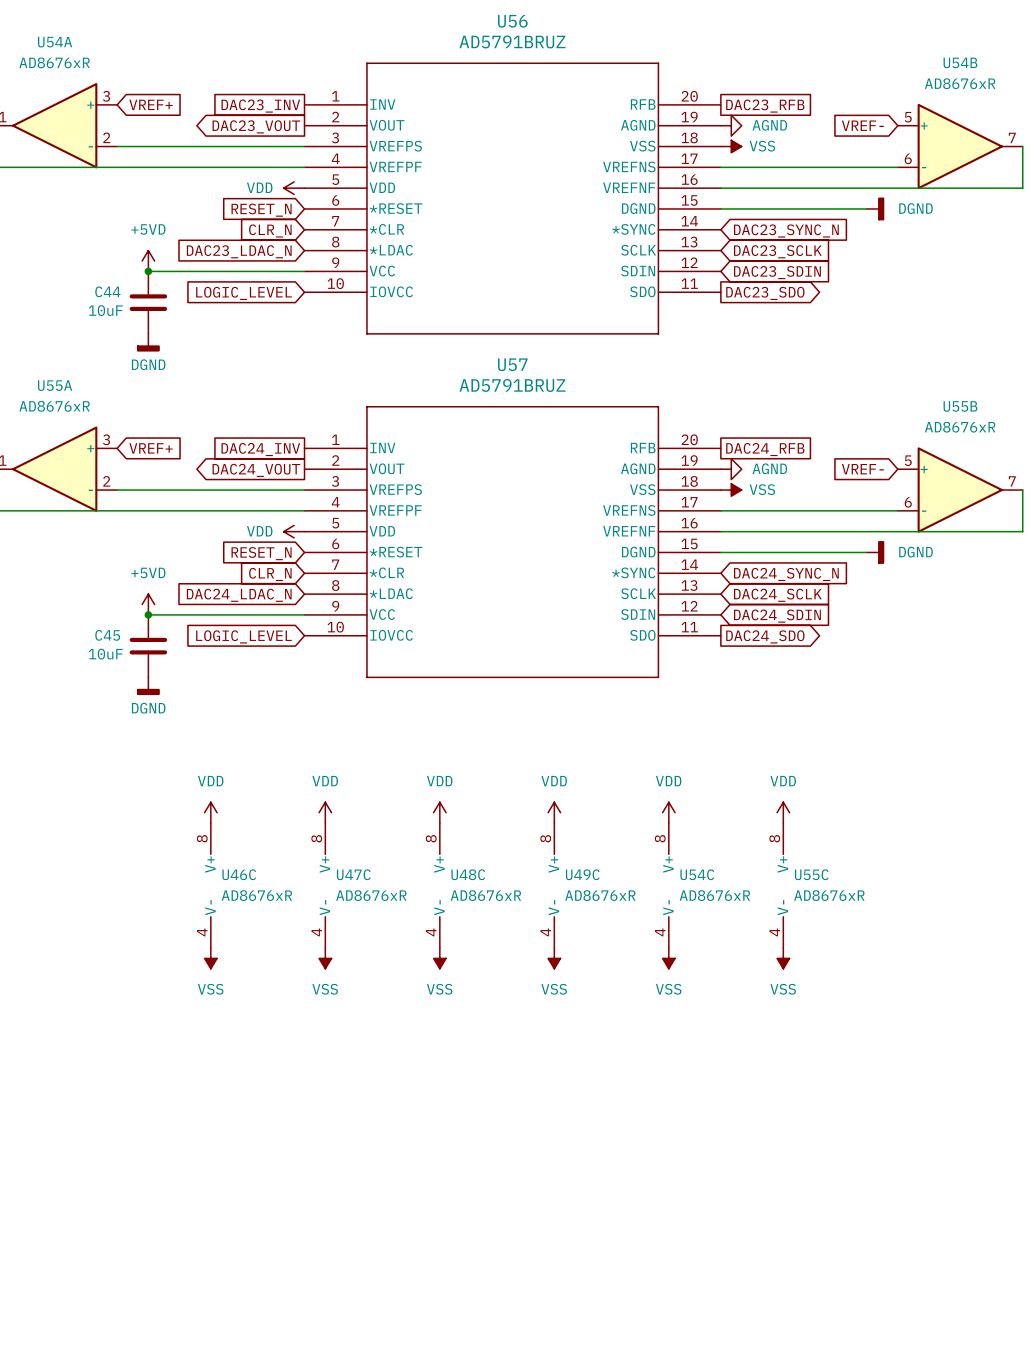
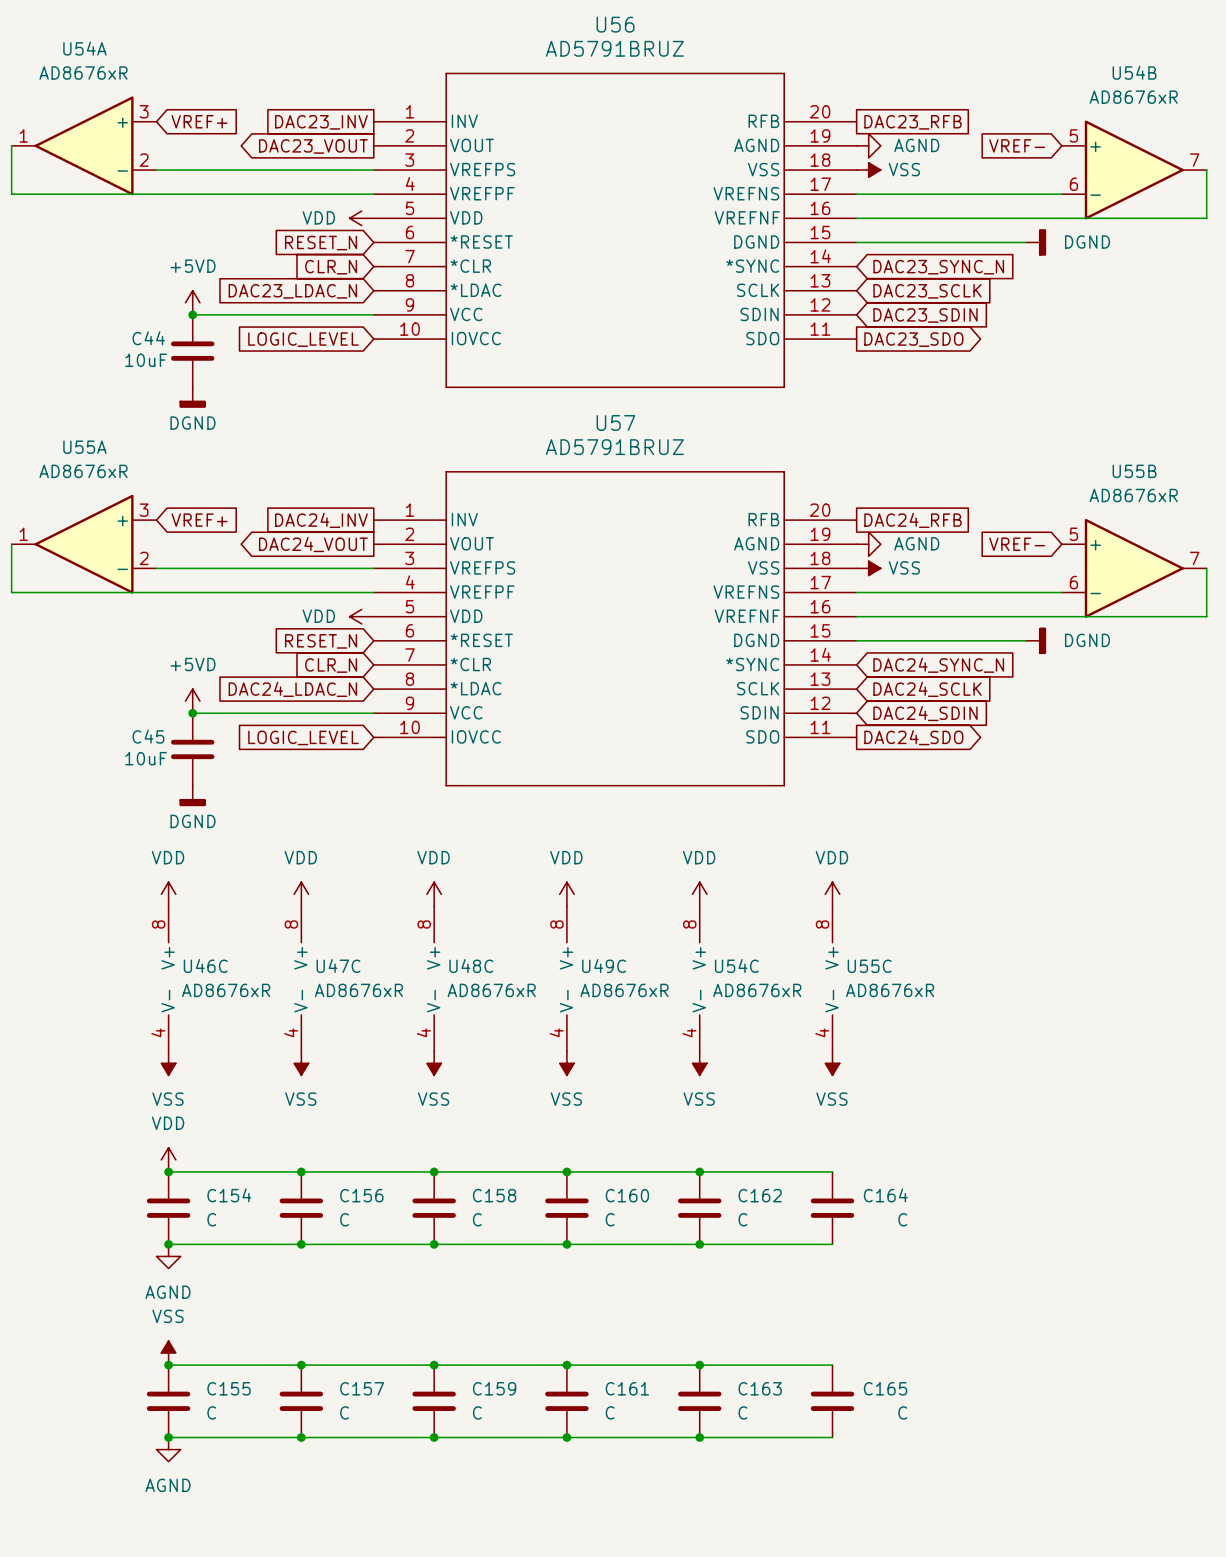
power symbol: none -> VDD (168, 894)
power symbol: none -> VDD (301, 894)
power symbol: none -> VDD (434, 894)
power symbol: none -> VDD (566, 894)
power symbol: none -> VDD (699, 894)
power symbol: none -> VDD (832, 894)
power symbol: VDD (210, 812) -> none
power symbol: VDD (325, 812) -> none
power symbol: VDD (439, 812) -> none
power symbol: VDD (554, 812) -> none
power symbol: VDD (668, 812) -> none
power symbol: VDD (783, 812) -> none
U46C position: (210, 885) -> (168, 978)
U47C position: (325, 885) -> (301, 978)
U48C position: (439, 885) -> (434, 978)
U49C position: (554, 885) -> (566, 978)
U54C position: (668, 885) -> (699, 978)
U55C position: (783, 885) -> (832, 978)
power symbol: none -> VSS (168, 1063)
power symbol: none -> VSS (301, 1063)
power symbol: none -> VSS (434, 1063)
power symbol: none -> VSS (566, 1063)
power symbol: none -> VSS (699, 1063)
power symbol: none -> VSS (832, 1063)
power symbol: VSS (210, 958) -> none
power symbol: VSS (325, 958) -> none
power symbol: VSS (439, 958) -> none
power symbol: VSS (554, 958) -> none
power symbol: VSS (668, 958) -> none
power symbol: VSS (783, 958) -> none
power symbol: none -> VDD (168, 1159)
wire: none -> (168, 1171) (832, 1171)
junction: none -> (168, 1171)
junction: none -> (301, 1171)
junction: none -> (434, 1171)
junction: none -> (566, 1171)
junction: none -> (699, 1171)
C154: none -> C (168, 1208)
C156: none -> C (301, 1208)
C158: none -> C (434, 1208)
C160: none -> C (566, 1208)
C162: none -> C (699, 1208)
C164: none -> C (832, 1208)
wire: none -> (168, 1244) (832, 1244)
junction: none -> (168, 1244)
junction: none -> (301, 1244)
junction: none -> (434, 1244)
junction: none -> (566, 1244)
junction: none -> (699, 1244)
power symbol: none -> AGND (168, 1256)
power symbol: none -> VSS (168, 1353)
wire: none -> (168, 1365) (832, 1365)
junction: none -> (168, 1365)
junction: none -> (301, 1365)
junction: none -> (434, 1365)
junction: none -> (566, 1365)
junction: none -> (699, 1365)
C155: none -> C (168, 1401)
C157: none -> C (301, 1401)
C159: none -> C (434, 1401)
C161: none -> C (566, 1401)
C163: none -> C (699, 1401)
C165: none -> C (832, 1401)
wire: none -> (168, 1437) (832, 1437)
junction: none -> (168, 1437)
junction: none -> (301, 1437)
junction: none -> (434, 1437)
junction: none -> (566, 1437)
junction: none -> (699, 1437)
power symbol: none -> AGND (168, 1449)

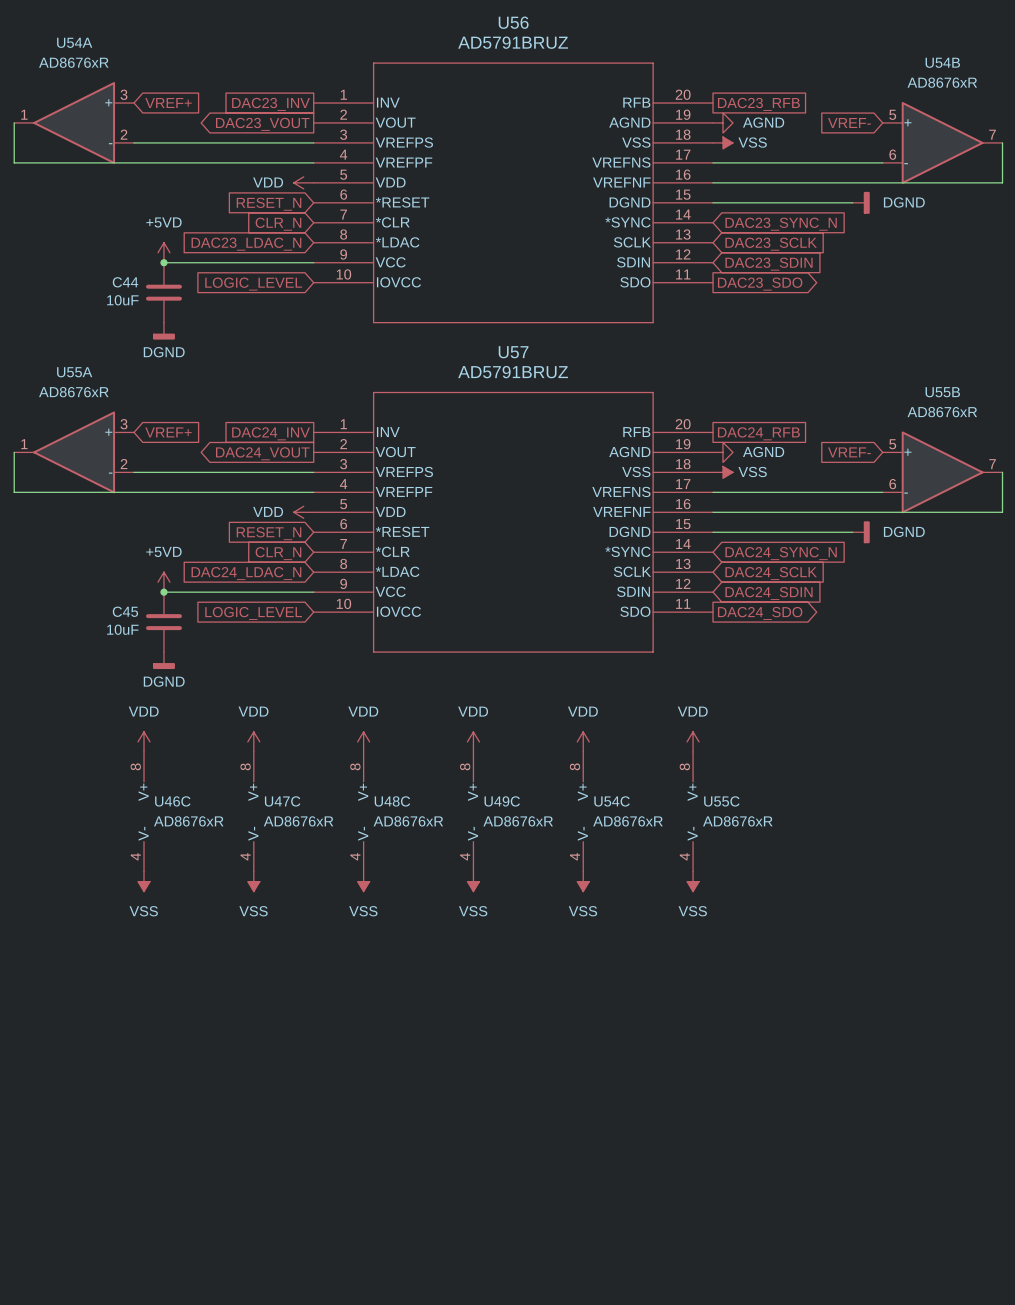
power symbol: VDD (168, 1159) -> none
wire: (168, 1171) (832, 1171) -> none
junction: (168, 1171) -> none
junction: (301, 1171) -> none
junction: (434, 1171) -> none
junction: (566, 1171) -> none
junction: (699, 1171) -> none
C154: C (168, 1208) -> none
C156: C (301, 1208) -> none
C158: C (434, 1208) -> none
C160: C (566, 1208) -> none
C162: C (699, 1208) -> none
C164: C (832, 1208) -> none
wire: (168, 1244) (832, 1244) -> none
junction: (168, 1244) -> none
junction: (301, 1244) -> none
junction: (434, 1244) -> none
junction: (566, 1244) -> none
junction: (699, 1244) -> none
power symbol: AGND (168, 1256) -> none
power symbol: VSS (168, 1353) -> none
wire: (168, 1365) (832, 1365) -> none
junction: (168, 1365) -> none
junction: (301, 1365) -> none
junction: (434, 1365) -> none
junction: (566, 1365) -> none
junction: (699, 1365) -> none
C155: C (168, 1401) -> none
C157: C (301, 1401) -> none
C159: C (434, 1401) -> none
C161: C (566, 1401) -> none
C163: C (699, 1401) -> none
C165: C (832, 1401) -> none
wire: (168, 1437) (832, 1437) -> none
junction: (168, 1437) -> none
junction: (301, 1437) -> none
junction: (434, 1437) -> none
junction: (566, 1437) -> none
junction: (699, 1437) -> none
power symbol: AGND (168, 1449) -> none

